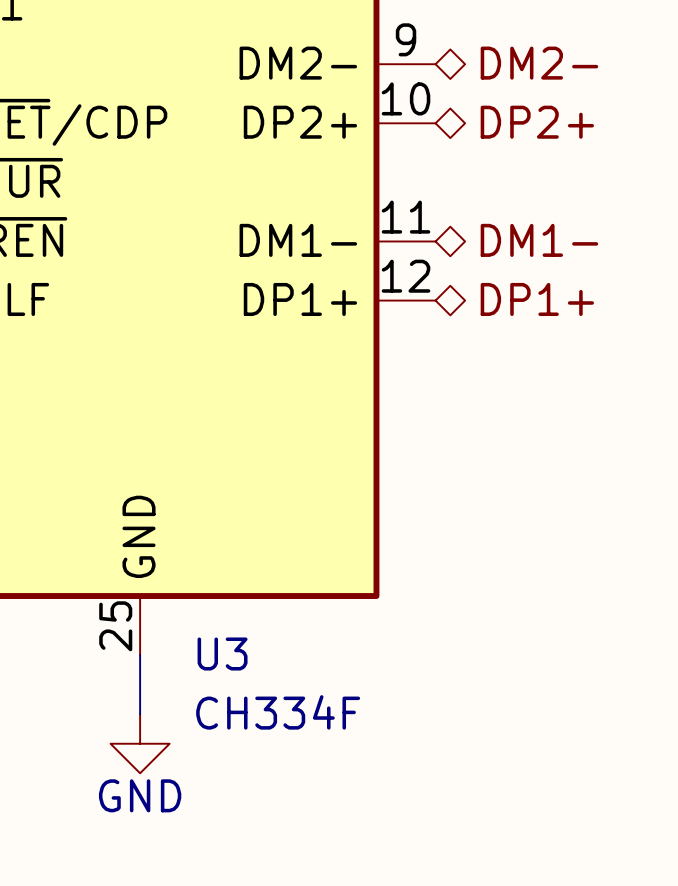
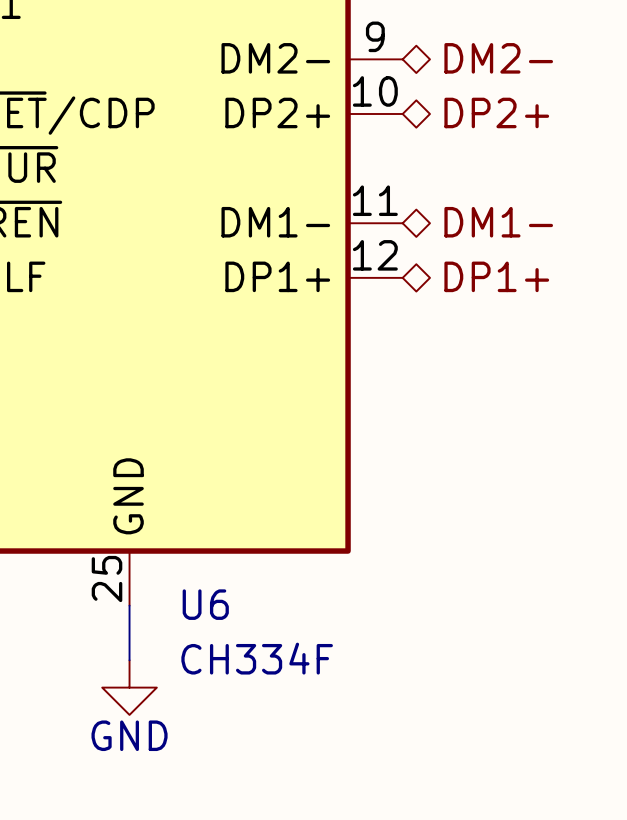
U3 name: U3 (222, 654) -> U6 (205, 604)

